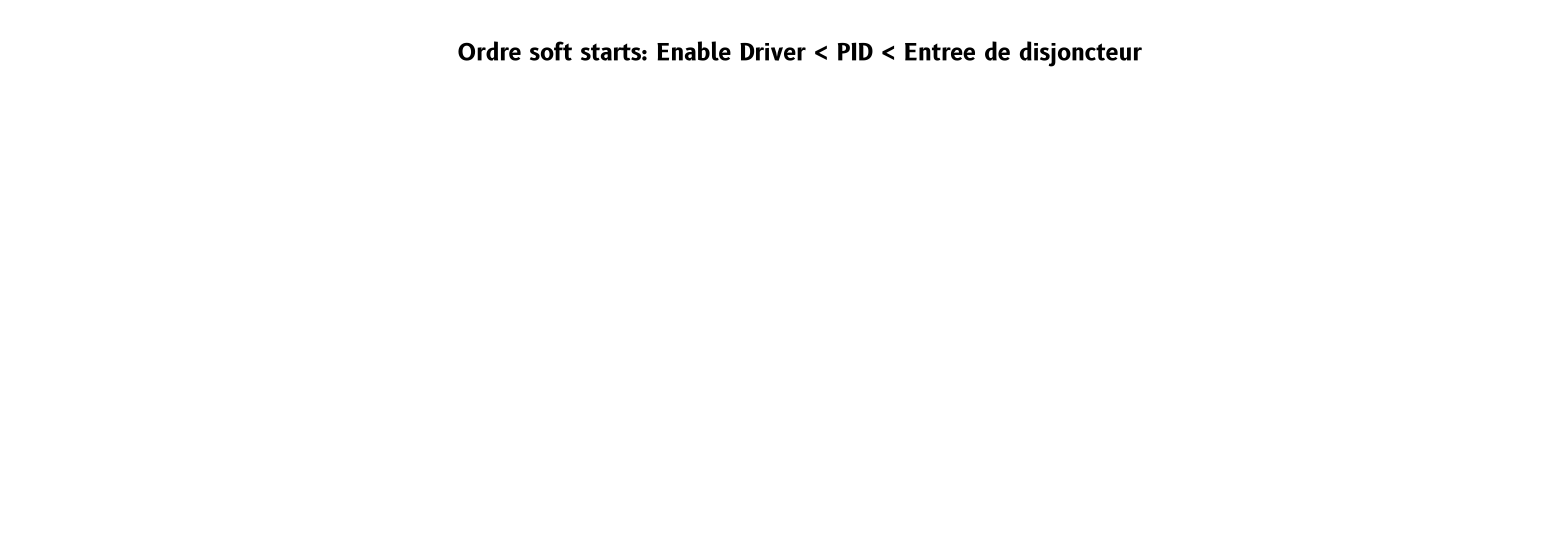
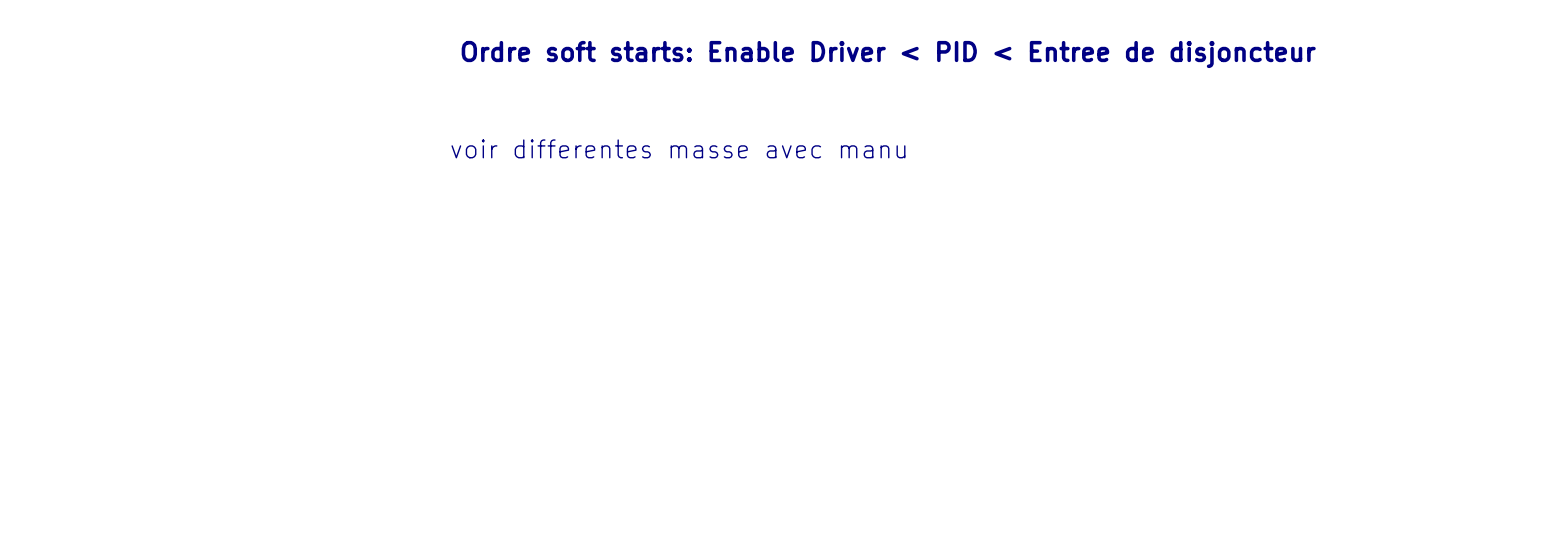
text: none -> voir differentes masse avec manu (678, 148)

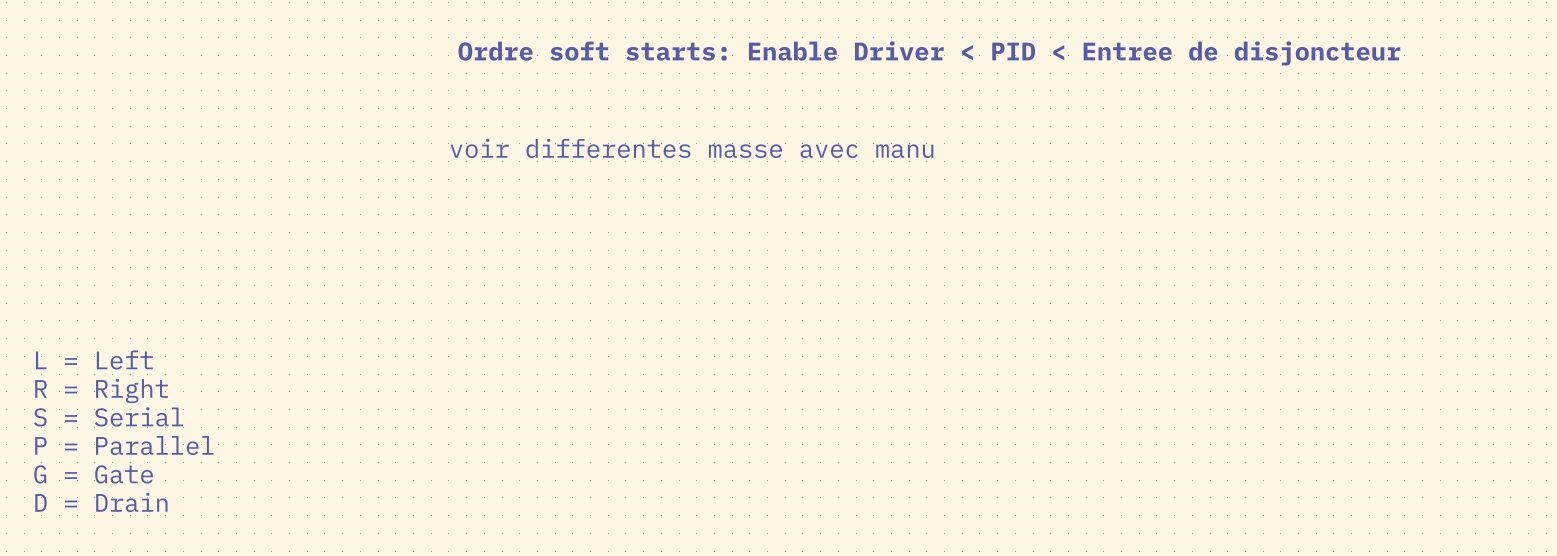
text: none -> L = Left (94, 360)
text: none -> R = Right (101, 390)
text: none -> S = Serial (108, 416)
text: none -> P = Parallel (124, 445)
text: none -> G = Gate (93, 474)
text: none -> D = Drain (101, 502)

